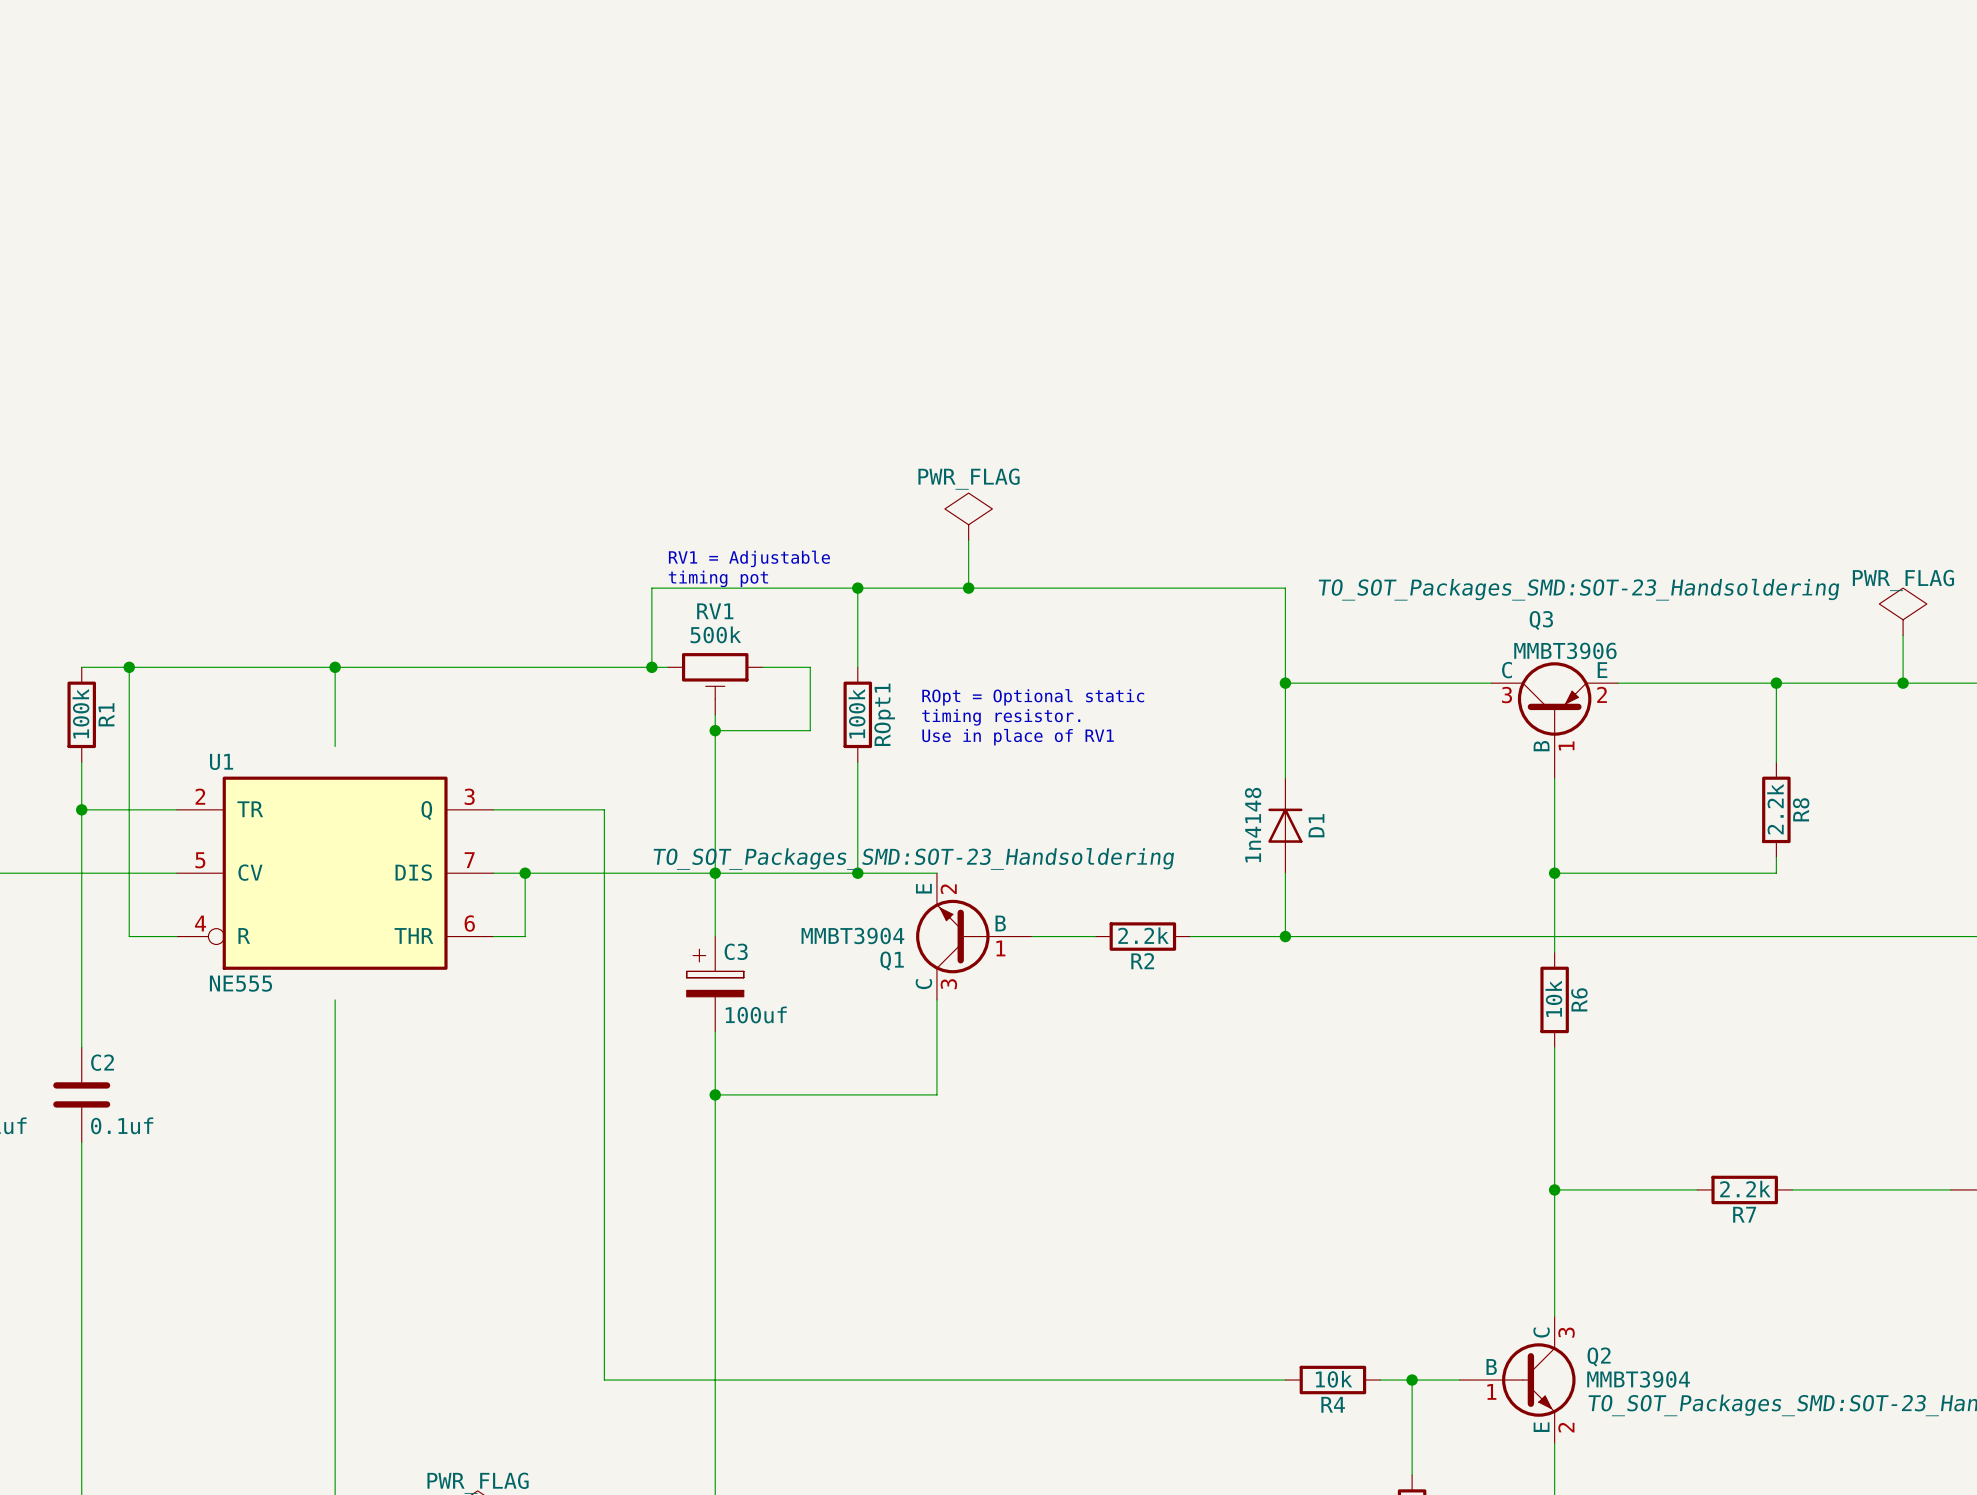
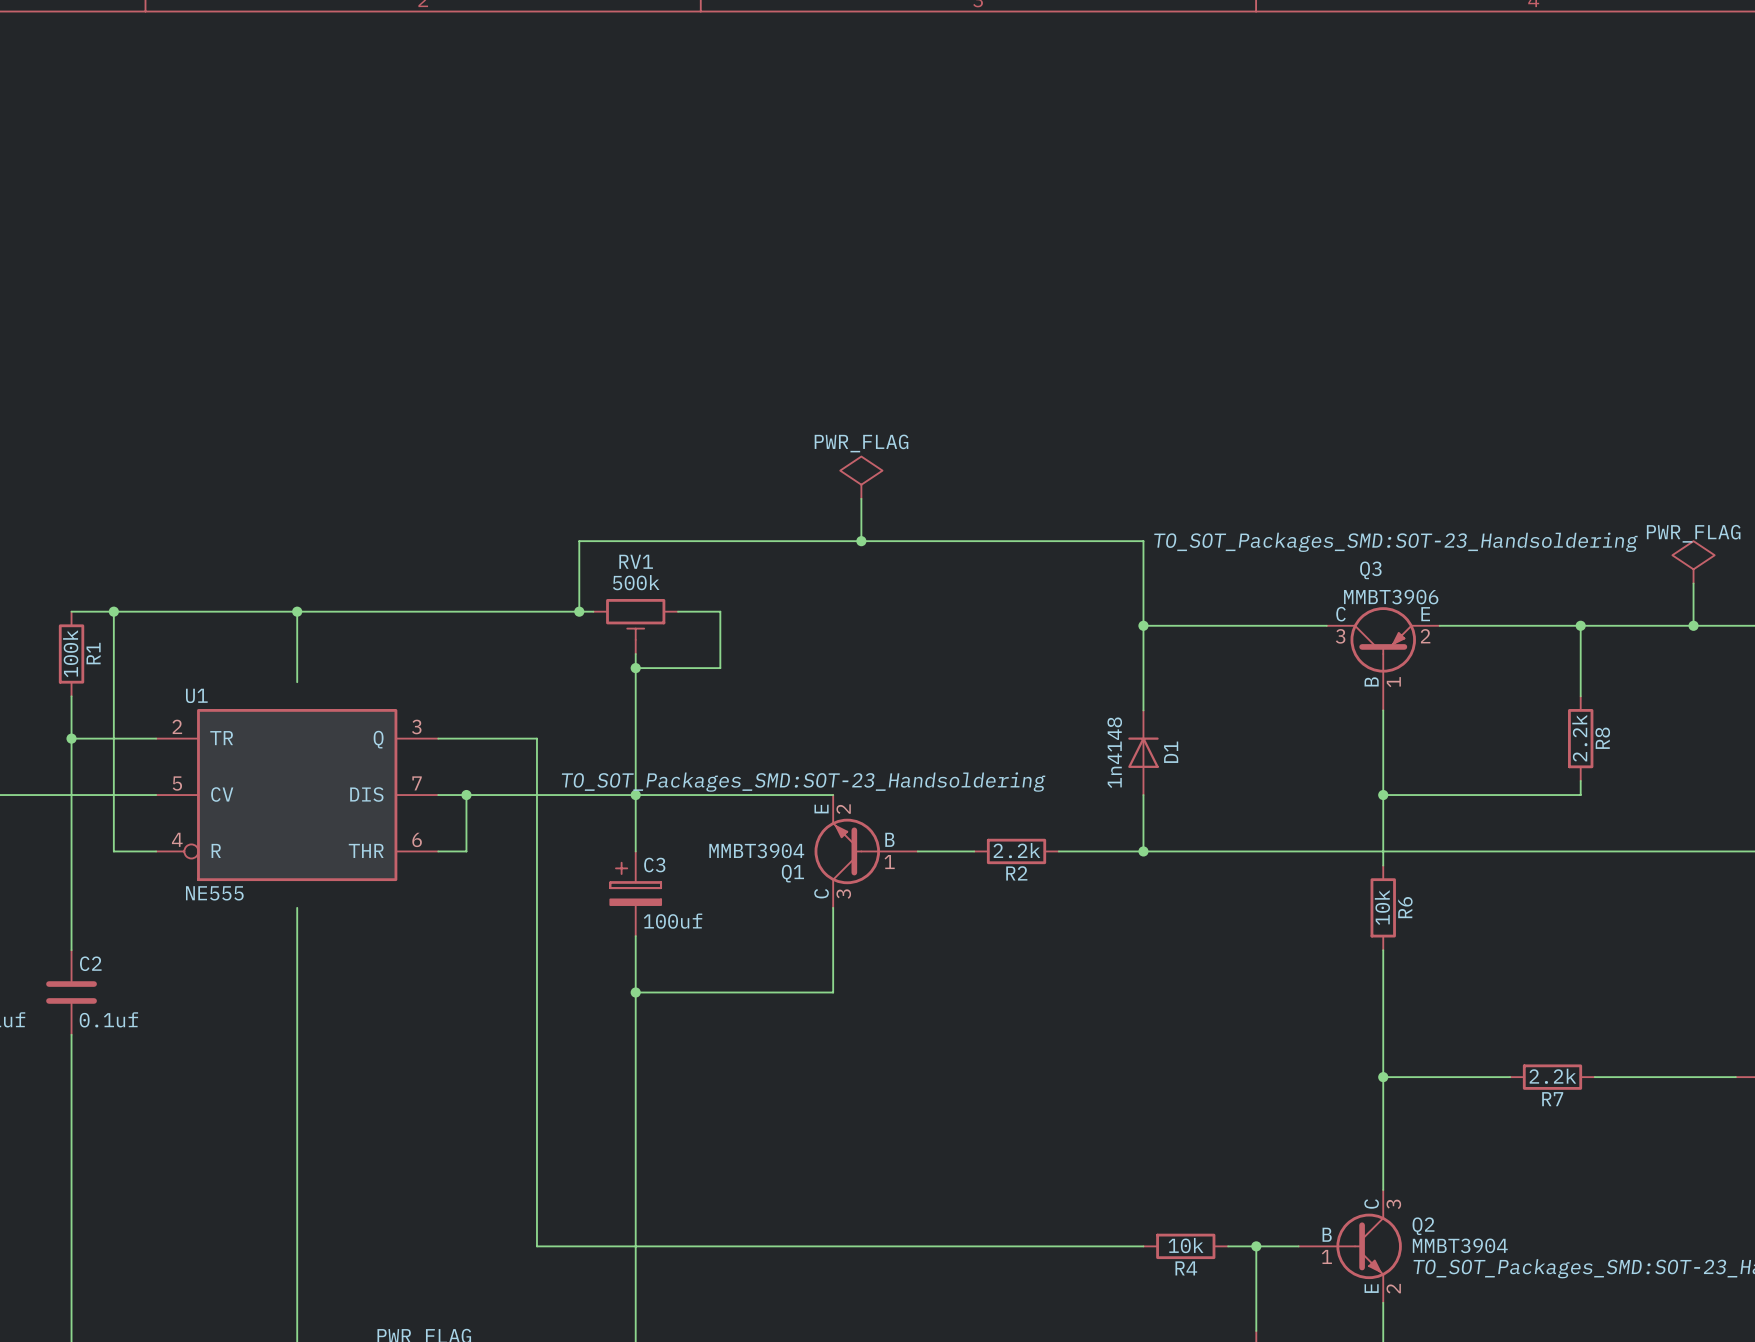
text: RV1 = Adjustable (749, 558) -> none
text: timing pot (718, 578) -> none
wire: (857, 588) (857, 667) -> none
junction: (857, 588) -> none
text: ROpt = Optional static (1033, 697) -> none
ROpt1: 100k (857, 714) -> none
text: timing resistor. (1001, 717) -> none
text: Use in place of RV1 (1018, 737) -> none
wire: (857, 762) (857, 873) -> none
junction: (857, 873) -> none

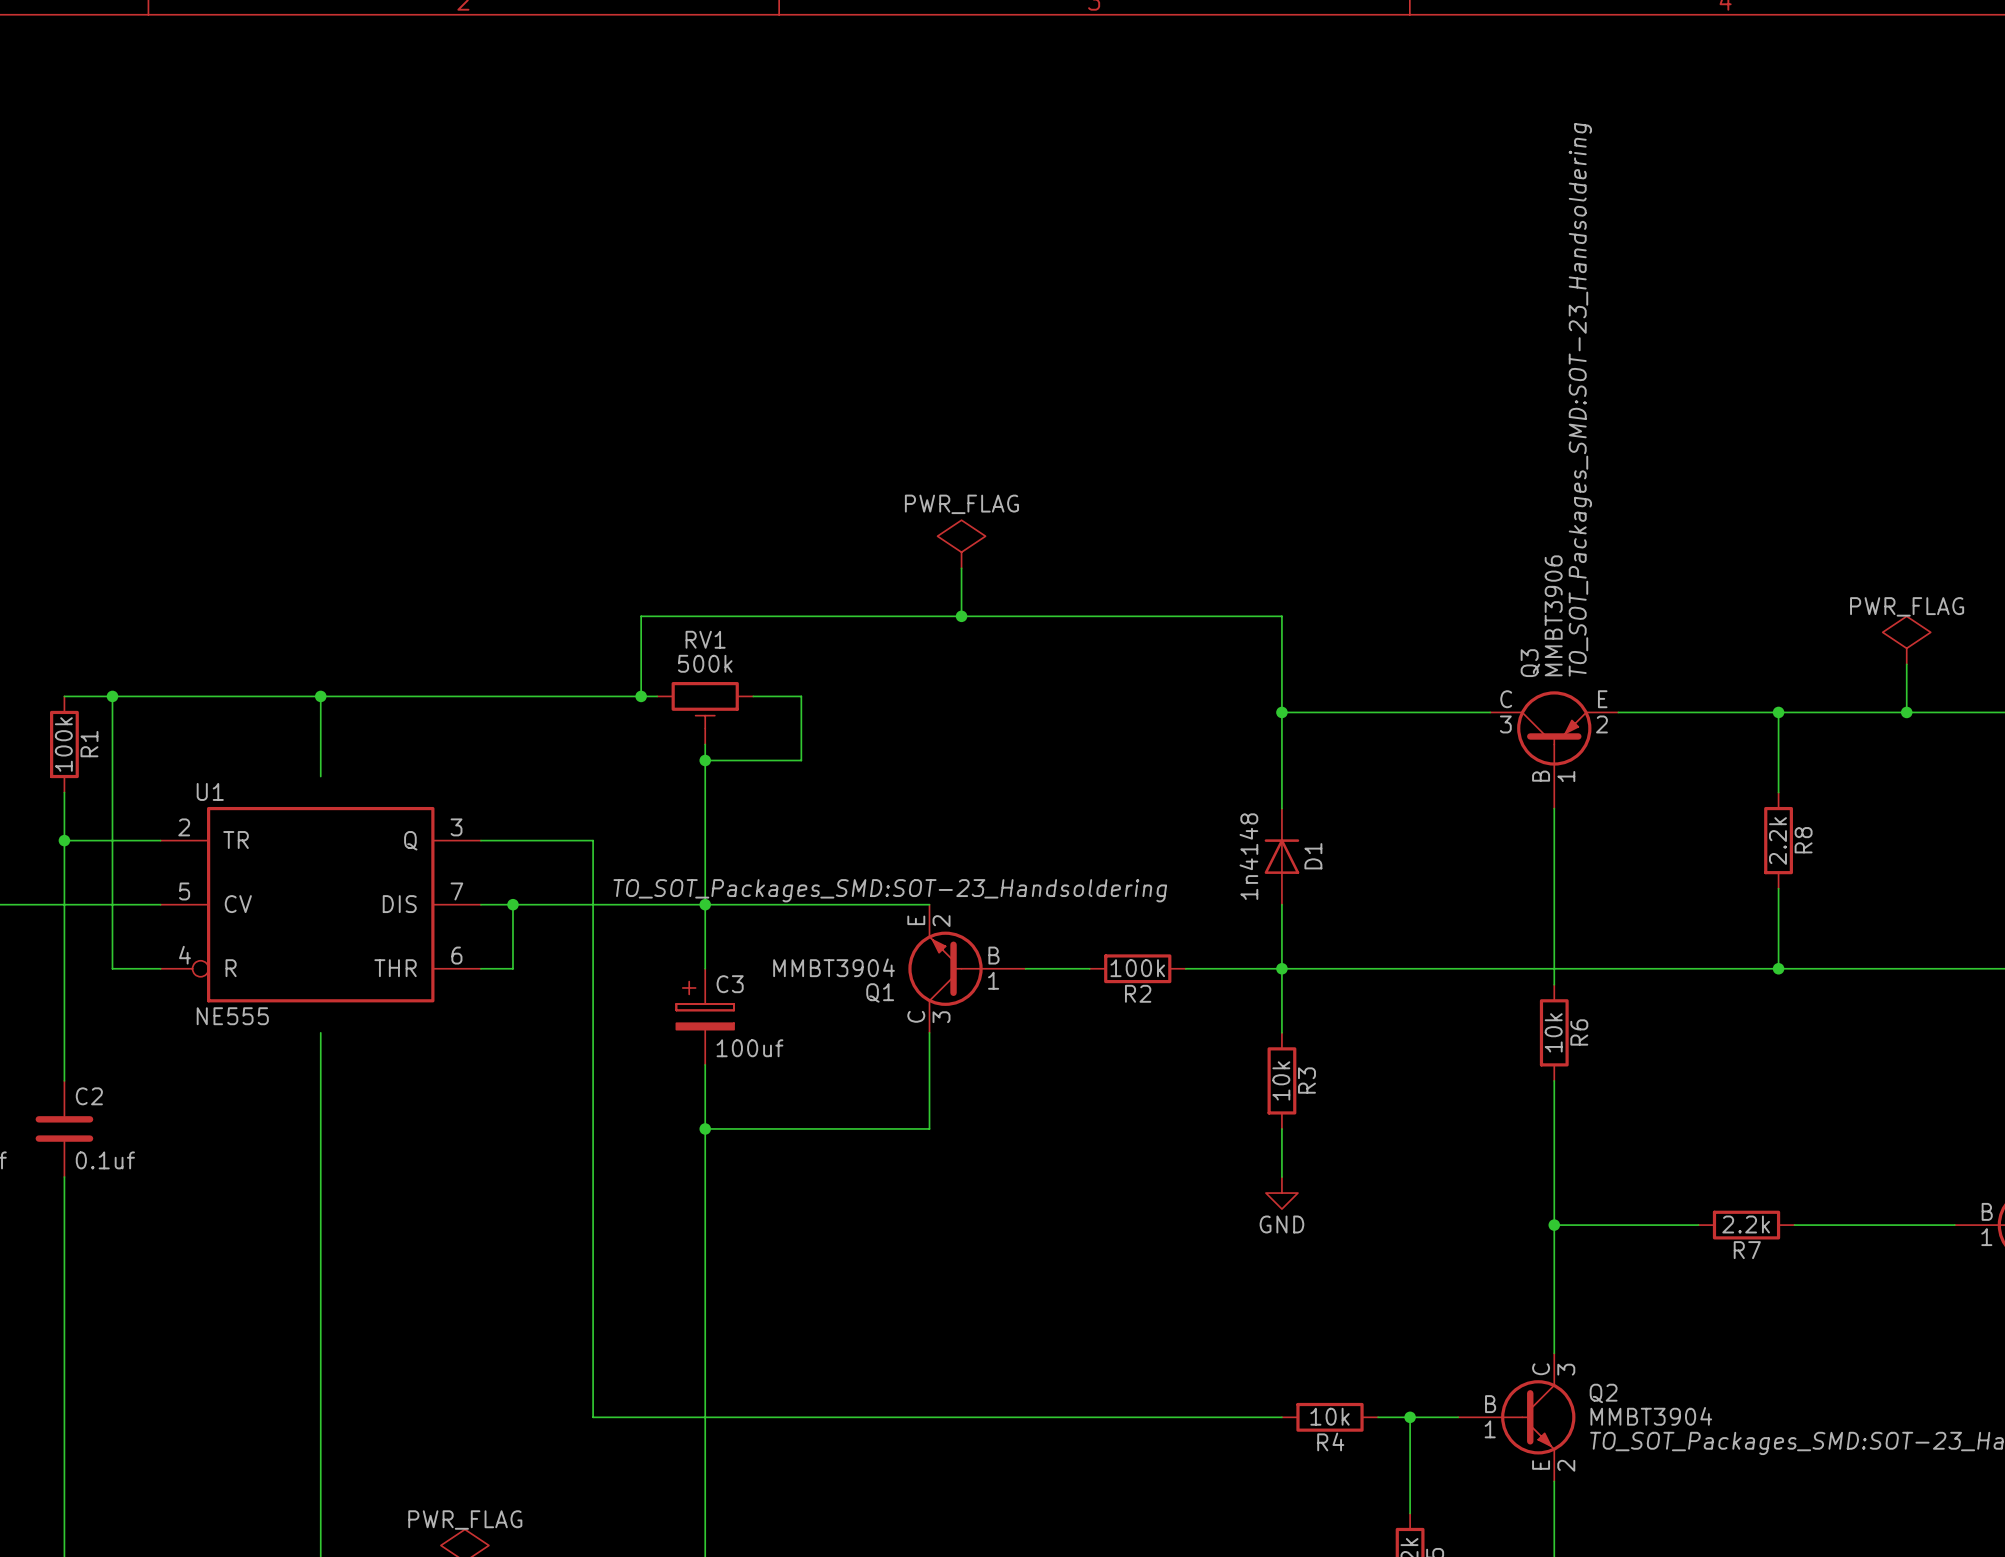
Q3 text rotation: 0° (1395, 542) -> 90° counterclockwise (1580, 399)
Q3 name rotation: 0° (1370, 570) -> 90° counterclockwise (1530, 663)
Q3 value rotation: 0° (1391, 597) -> 90° counterclockwise (1553, 615)
wire: (1383, 795) (1580, 795) -> (1778, 968) (1778, 904)
junction: (1383, 795) -> none
R2 value: 2.2k (1016, 850) -> 100k (1137, 968)
wire: none -> (1281, 968) (1281, 1032)
junction: none -> (1778, 968)
R3: none -> 10k (1281, 1080)
wire: none -> (1281, 1128) (1281, 1177)
power symbol: none -> GND (1281, 1193)

